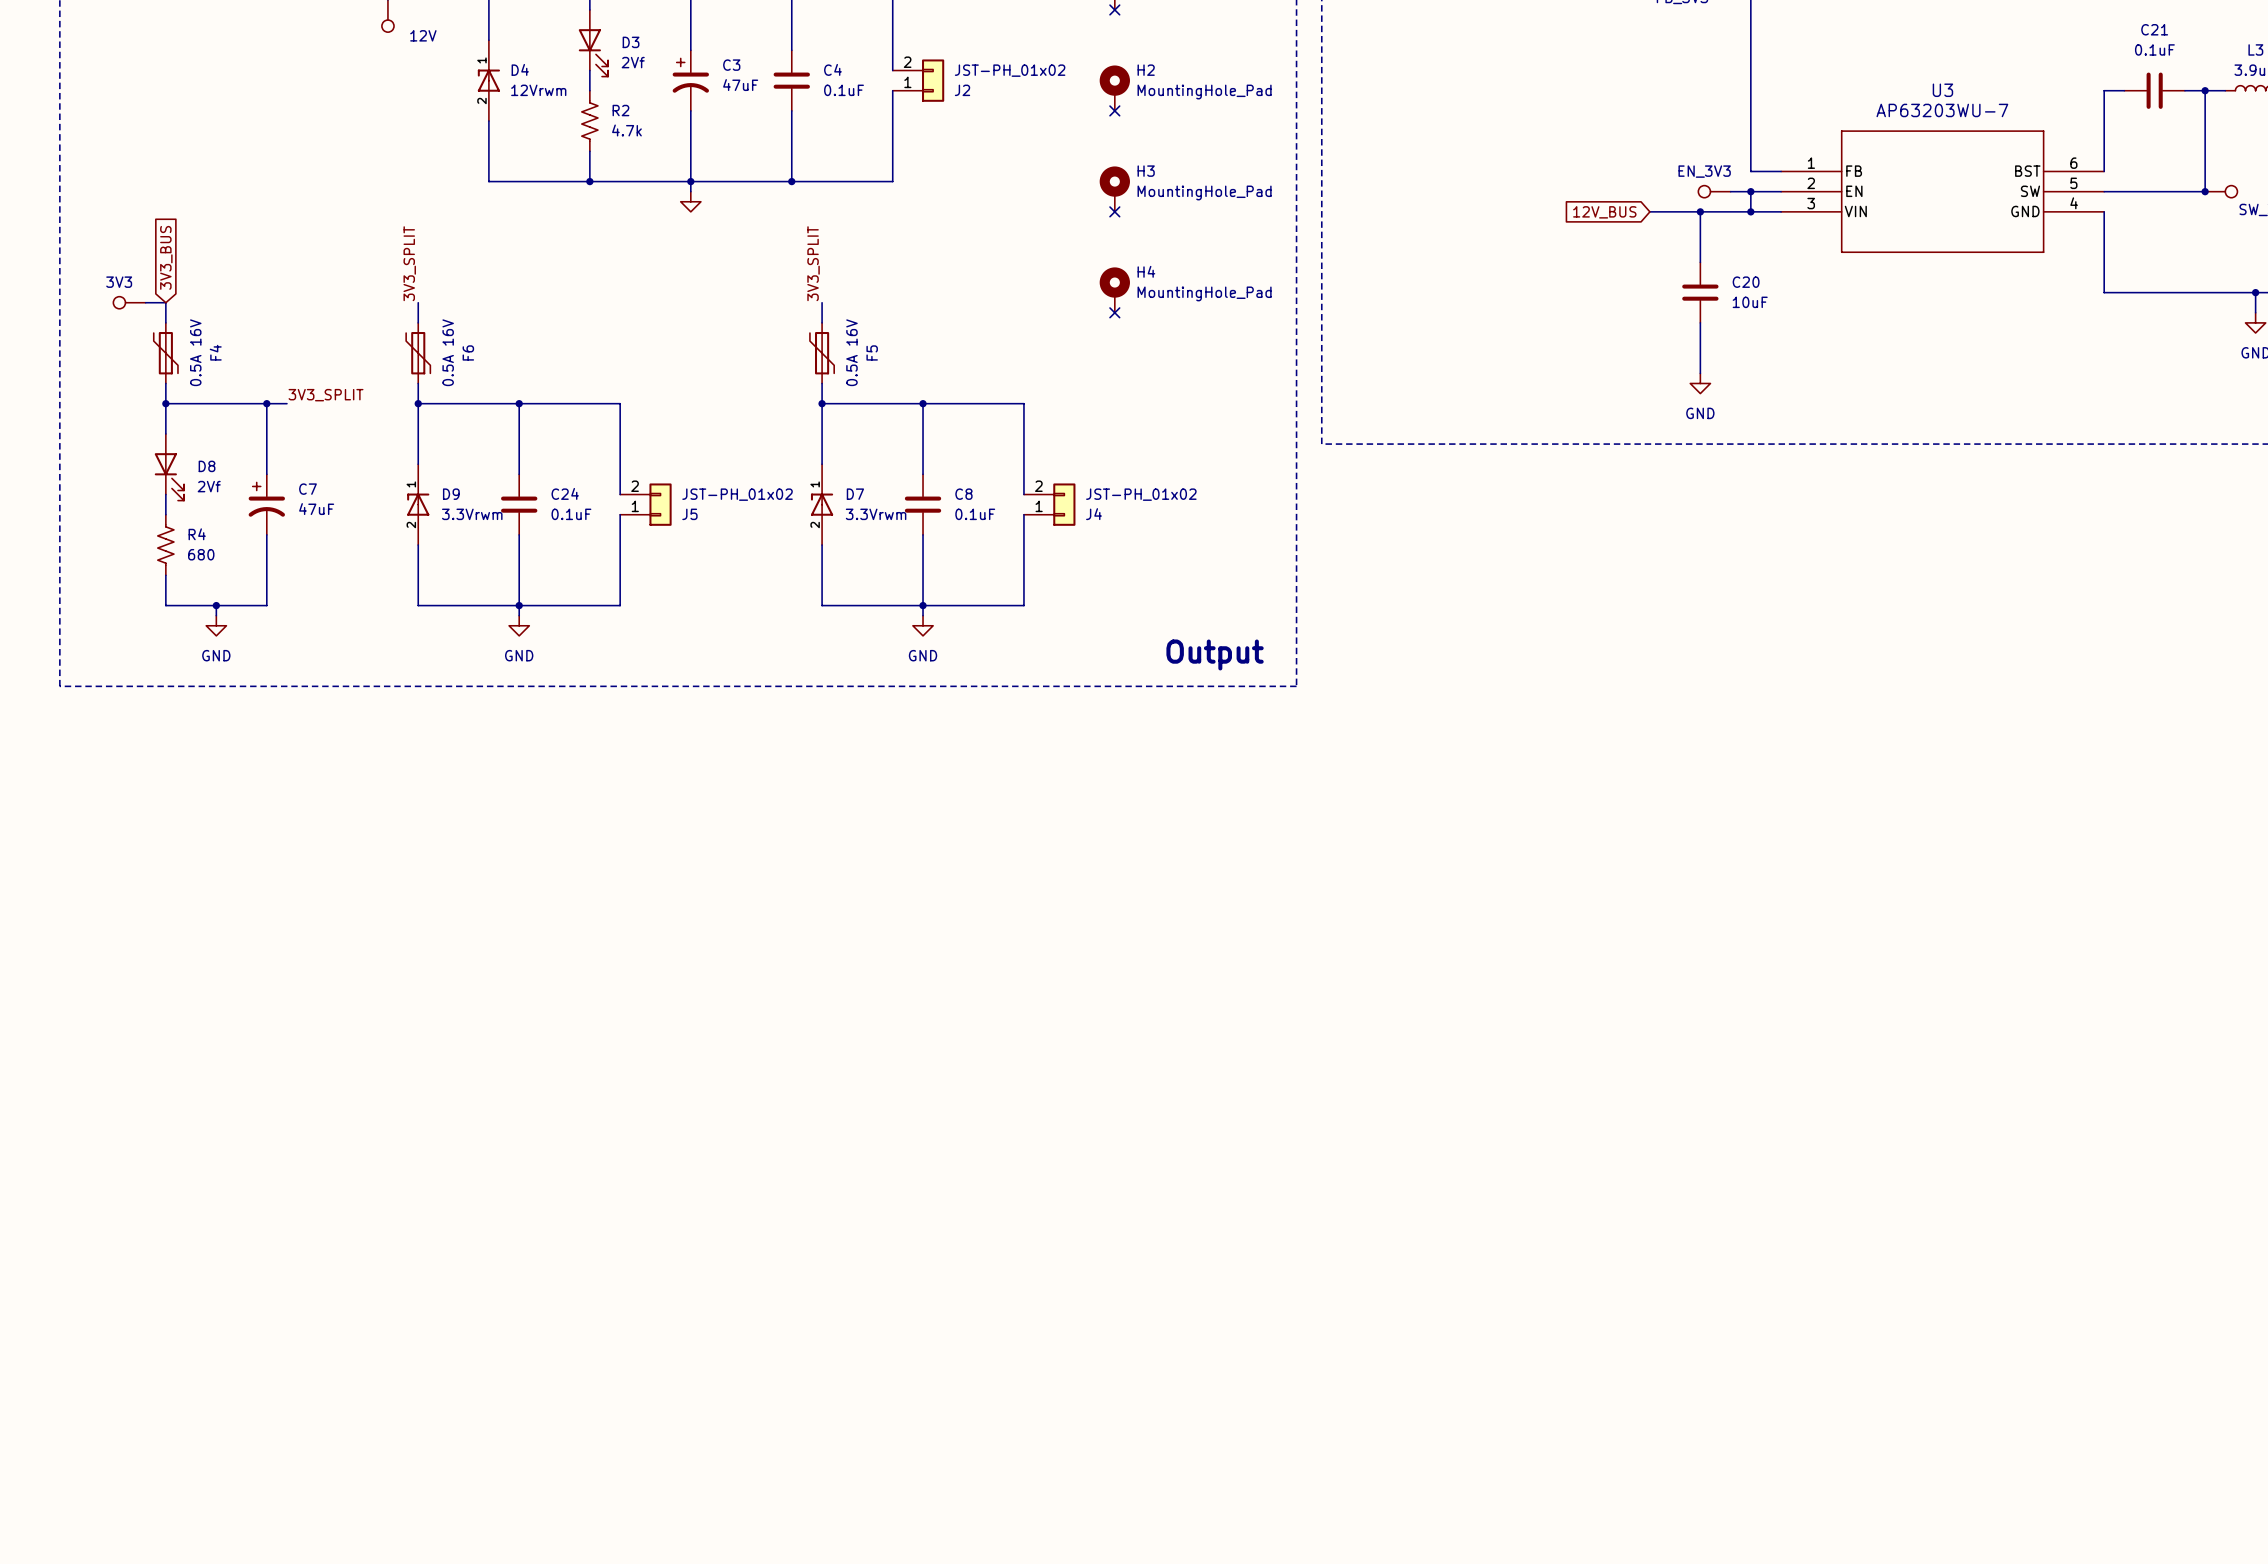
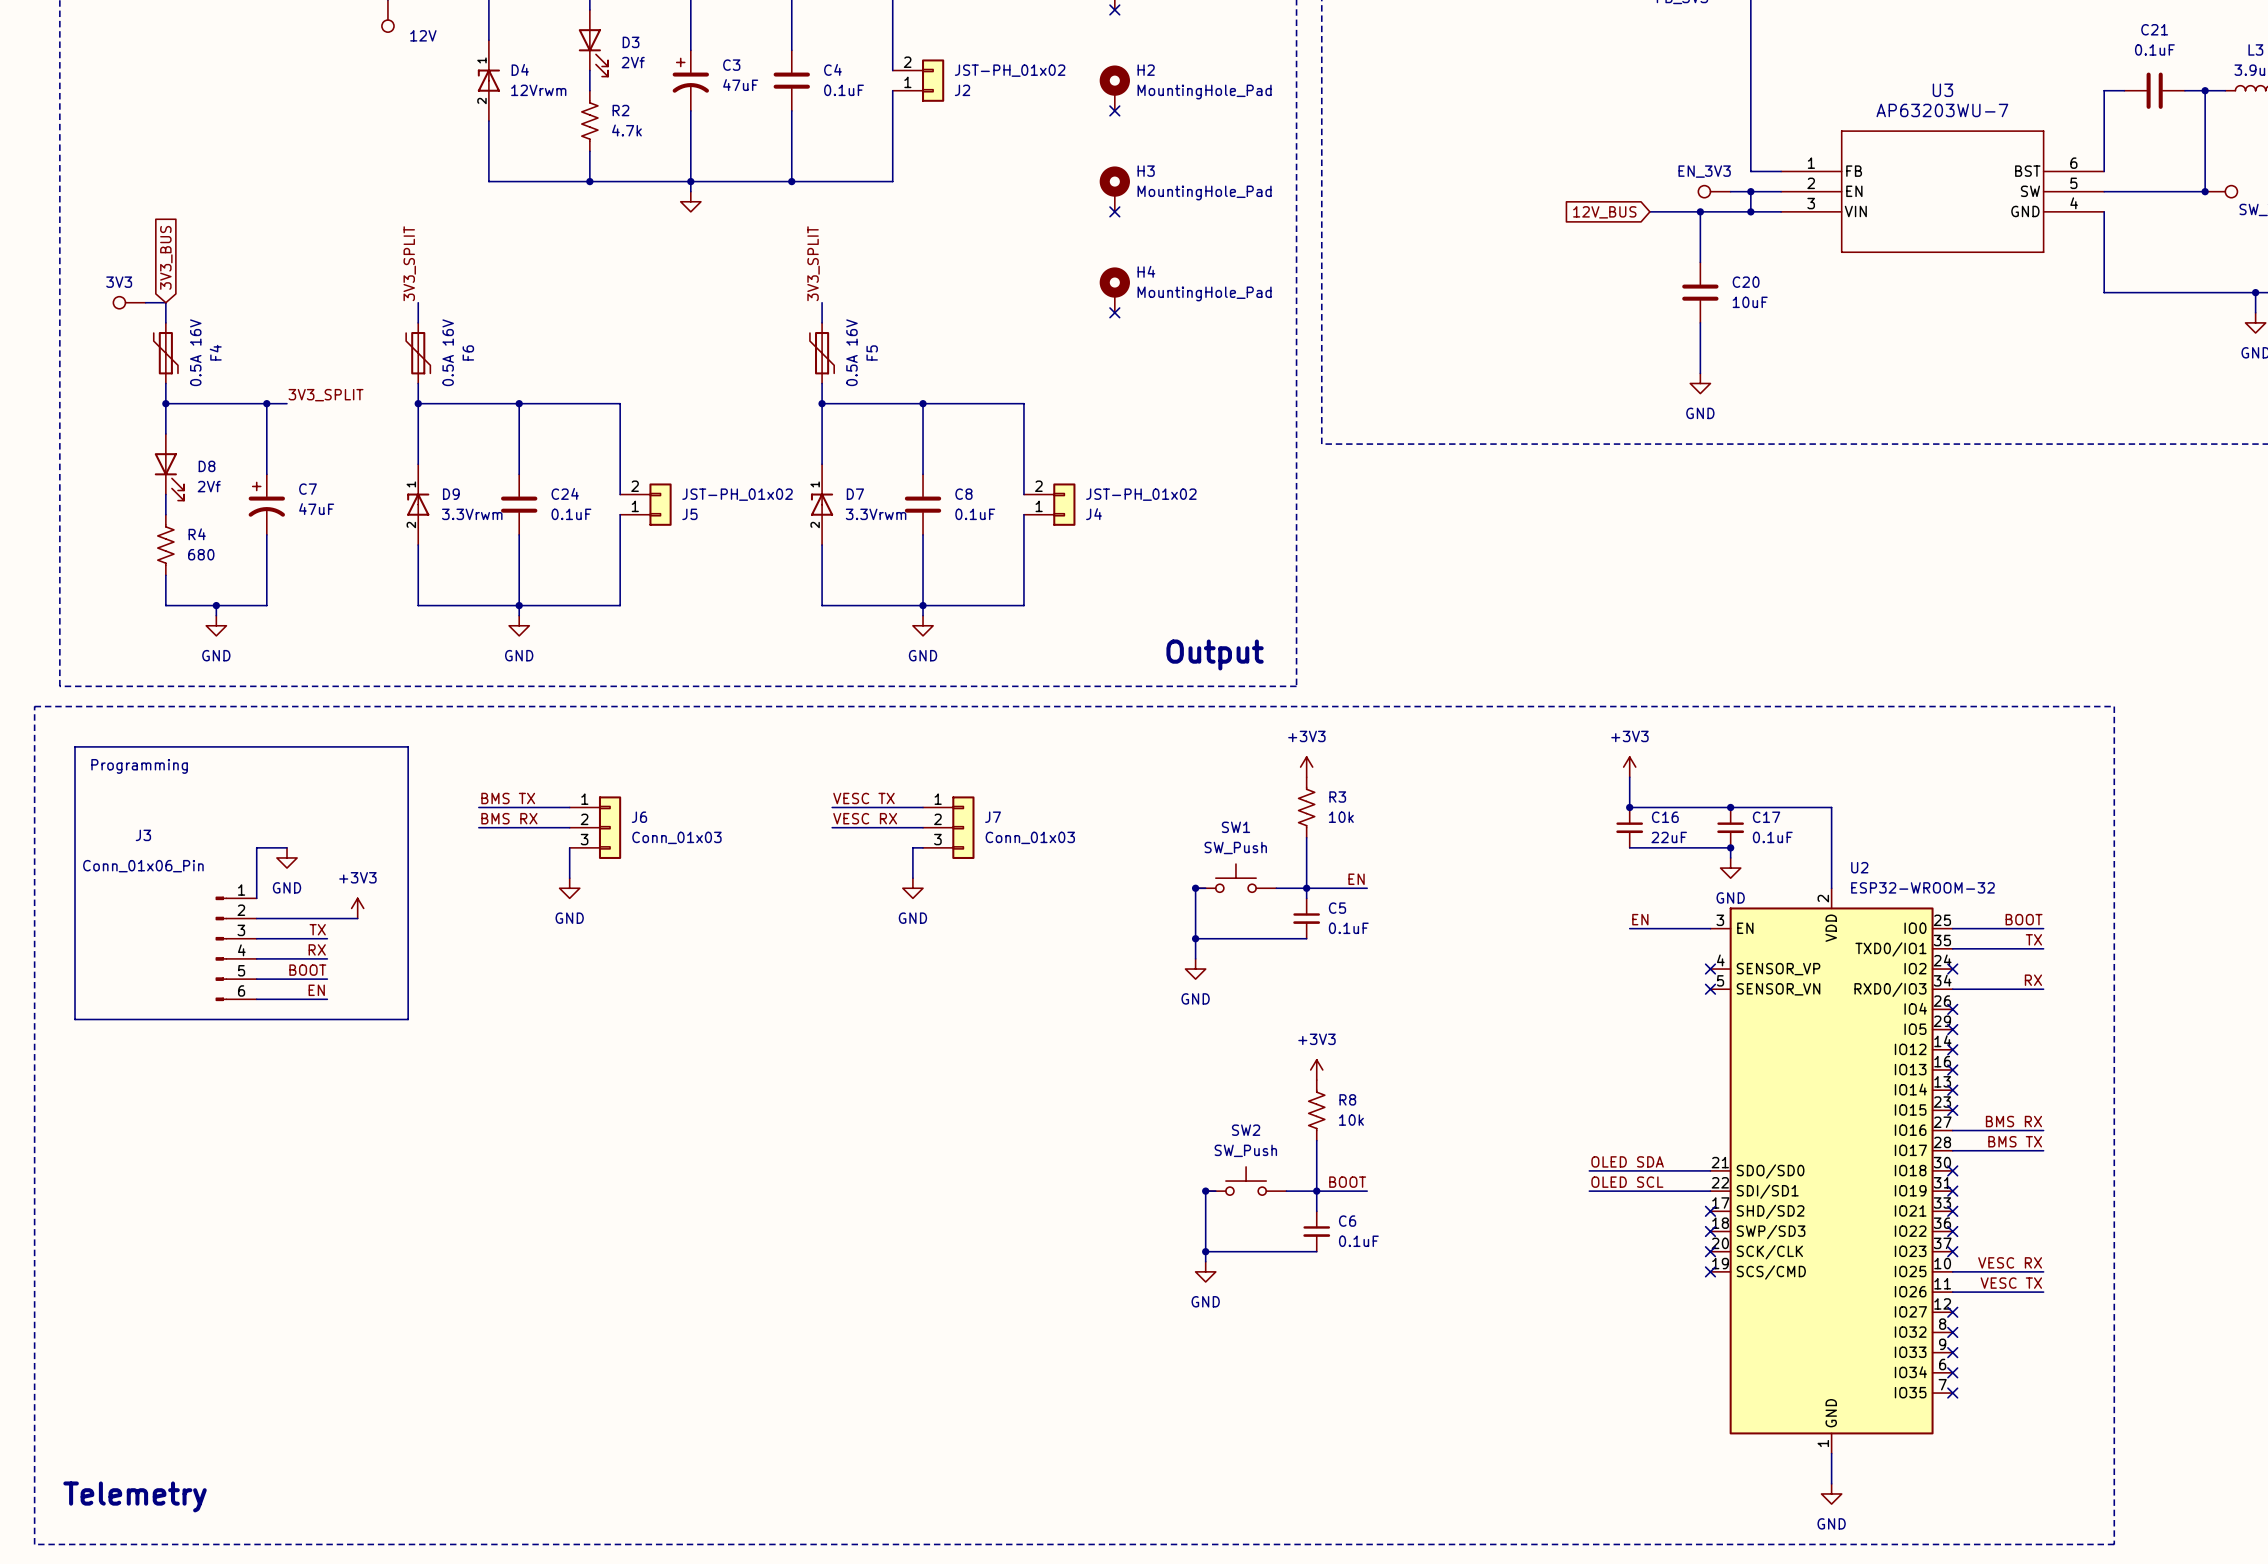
line: none -> (34, 706) (2114, 706) (2114, 1544) (34, 1544) (34, 706)
line: none -> (75, 746) (408, 746) (408, 1019) (75, 1019) (75, 746)
text: none -> Programming (139, 766)
power symbol: none -> +3V3 (1306, 767)
power symbol: none -> +3V3 (1629, 767)
wire: none -> (1629, 777) (1629, 807) (1831, 807) (1831, 888)
label: none -> BMS TX (508, 798)
label: none -> VESC TX (863, 798)
wire: none -> (478, 807) (569, 807)
wire: none -> (832, 807) (923, 807)
R3: none -> 10k (1306, 807)
junction: none -> (1629, 807)
junction: none -> (1730, 807)
label: none -> BMS RX (509, 818)
label: none -> VESC RX (865, 818)
wire: none -> (478, 827) (569, 827)
J6: none -> Conn_01x03 (595, 827)
wire: none -> (832, 827) (923, 827)
J7: none -> Conn_01x03 (948, 827)
C16: none -> 22uF (1629, 827)
C17: none -> 0.1uF (1730, 827)
wire: none -> (1306, 837) (1306, 898)
wire: none -> (287, 847) (256, 847) (256, 898)
wire: none -> (569, 847) (569, 878)
wire: none -> (923, 847) (912, 847) (912, 878)
wire: none -> (1629, 847) (1730, 847) (1730, 857)
junction: none -> (1730, 847)
power symbol: none -> GND (287, 857)
power symbol: none -> GND (1730, 868)
SW1: none -> SW_Push (1235, 878)
label: none -> EN (1356, 879)
power symbol: none -> GND (569, 888)
power symbol: none -> GND (912, 888)
junction: none -> (1195, 888)
wire: none -> (1205, 888) (1195, 888) (1195, 958)
wire: none -> (1276, 888) (1367, 888)
junction: none -> (1306, 888)
power symbol: none -> +3V3 (357, 908)
wire: none -> (256, 918) (357, 918)
C5: none -> 0.1uF (1306, 918)
label: none -> EN (1640, 919)
label: none -> BOOT (2024, 919)
wire: none -> (1629, 928) (1710, 928)
wire: none -> (1952, 928) (2043, 928)
label: none -> TX (317, 929)
wire: none -> (256, 938) (327, 938)
wire: none -> (1195, 938) (1306, 938)
junction: none -> (1195, 938)
label: none -> TX (2033, 939)
J3: none -> Conn_01x06_Pin (236, 948)
wire: none -> (1952, 948) (2043, 948)
label: none -> RX (317, 949)
wire: none -> (256, 958) (327, 958)
power symbol: none -> GND (1195, 969)
no-connect mark: none -> (1710, 969)
no-connect mark: none -> (1952, 969)
label: none -> BOOT (307, 970)
wire: none -> (256, 979) (327, 979)
label: none -> RX (2033, 980)
no-connect mark: none -> (1710, 989)
wire: none -> (1952, 989) (2043, 989)
label: none -> EN (316, 990)
wire: none -> (256, 999) (327, 999)
no-connect mark: none -> (1952, 1009)
no-connect mark: none -> (1952, 1029)
no-connect mark: none -> (1952, 1049)
power symbol: none -> +3V3 (1316, 1069)
no-connect mark: none -> (1952, 1069)
no-connect mark: none -> (1952, 1090)
R8: none -> 10k (1316, 1110)
no-connect mark: none -> (1952, 1110)
label: none -> BMS RX (2013, 1121)
wire: none -> (1952, 1130) (2043, 1130)
wire: none -> (1316, 1140) (1316, 1211)
label: none -> BMS TX (2015, 1141)
wire: none -> (1952, 1150) (2043, 1150)
label: none -> OLED SDA (1627, 1161)
wire: none -> (1589, 1170) (1710, 1170)
U2: none -> ESP32-WROOM-32 (1831, 1170)
no-connect mark: none -> (1952, 1170)
SW2: none -> SW_Push (1246, 1181)
label: none -> BOOT (1347, 1182)
label: none -> OLED SCL (1627, 1182)
junction: none -> (1205, 1191)
wire: none -> (1215, 1191) (1205, 1191) (1205, 1261)
wire: none -> (1286, 1191) (1367, 1191)
junction: none -> (1316, 1191)
wire: none -> (1589, 1191) (1710, 1191)
no-connect mark: none -> (1952, 1191)
no-connect mark: none -> (1710, 1211)
no-connect mark: none -> (1952, 1211)
C6: none -> 0.1uF (1316, 1231)
no-connect mark: none -> (1710, 1231)
no-connect mark: none -> (1952, 1231)
wire: none -> (1205, 1251) (1316, 1251)
junction: none -> (1205, 1251)
no-connect mark: none -> (1710, 1251)
no-connect mark: none -> (1952, 1251)
label: none -> VESC RX (2010, 1262)
power symbol: none -> GND (1205, 1271)
no-connect mark: none -> (1710, 1271)
wire: none -> (1952, 1271) (2043, 1271)
label: none -> VESC TX (2011, 1283)
wire: none -> (1952, 1292) (2043, 1292)
no-connect mark: none -> (1952, 1312)
no-connect mark: none -> (1952, 1332)
no-connect mark: none -> (1952, 1352)
no-connect mark: none -> (1952, 1372)
no-connect mark: none -> (1952, 1393)
wire: none -> (1831, 1453) (1831, 1483)
power symbol: none -> GND (1831, 1493)
text: none -> Telemetry (135, 1496)

